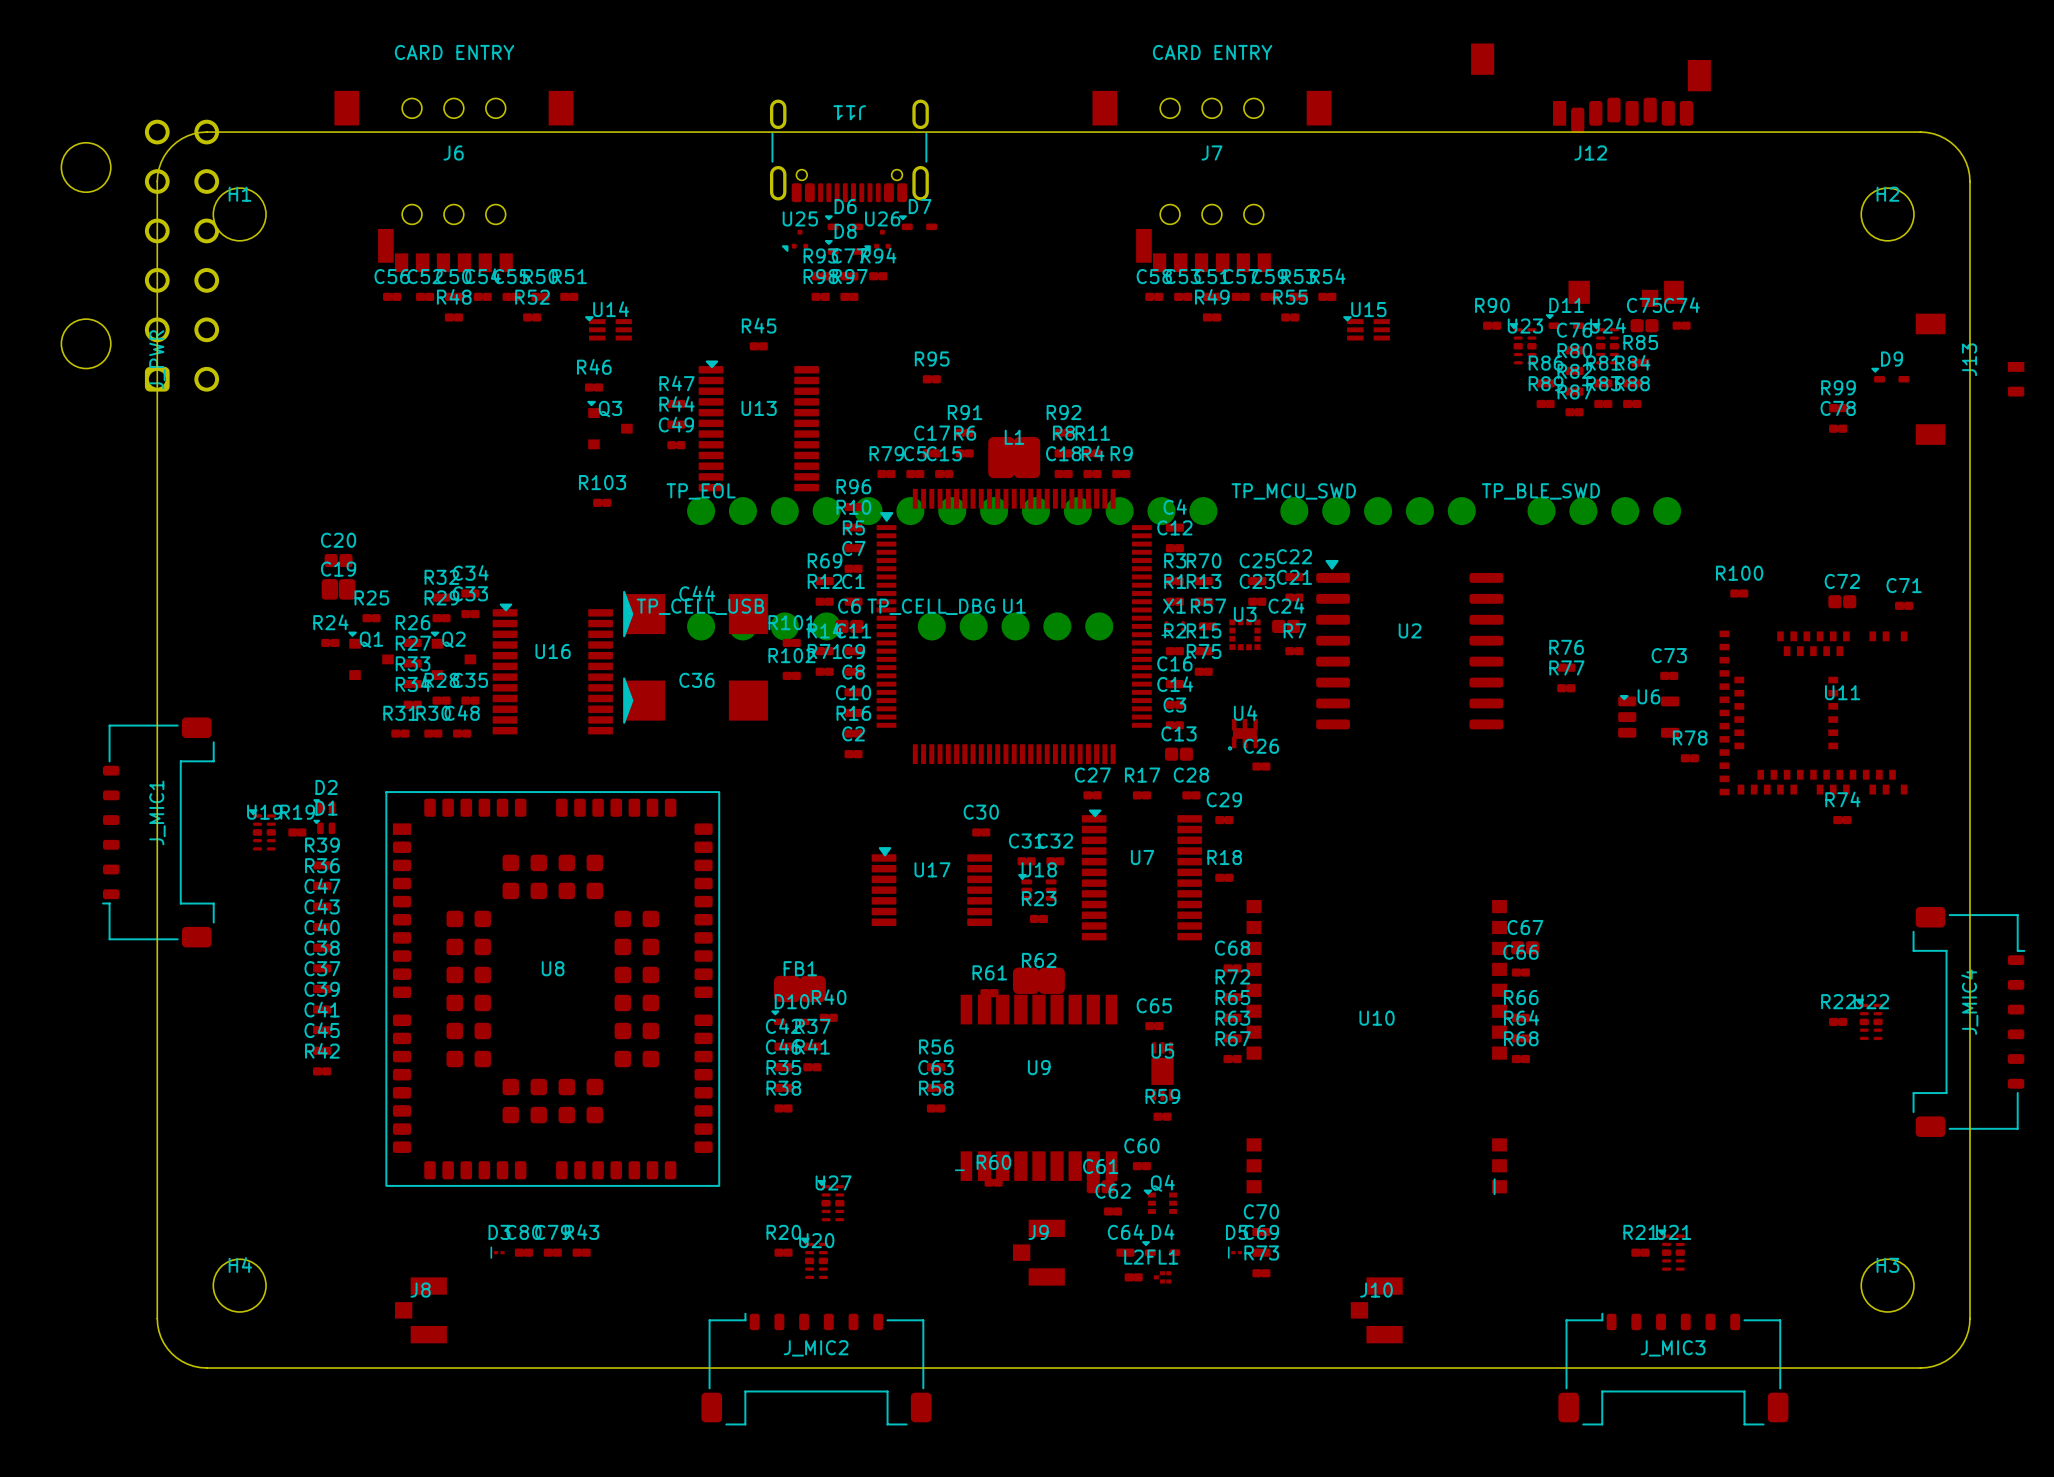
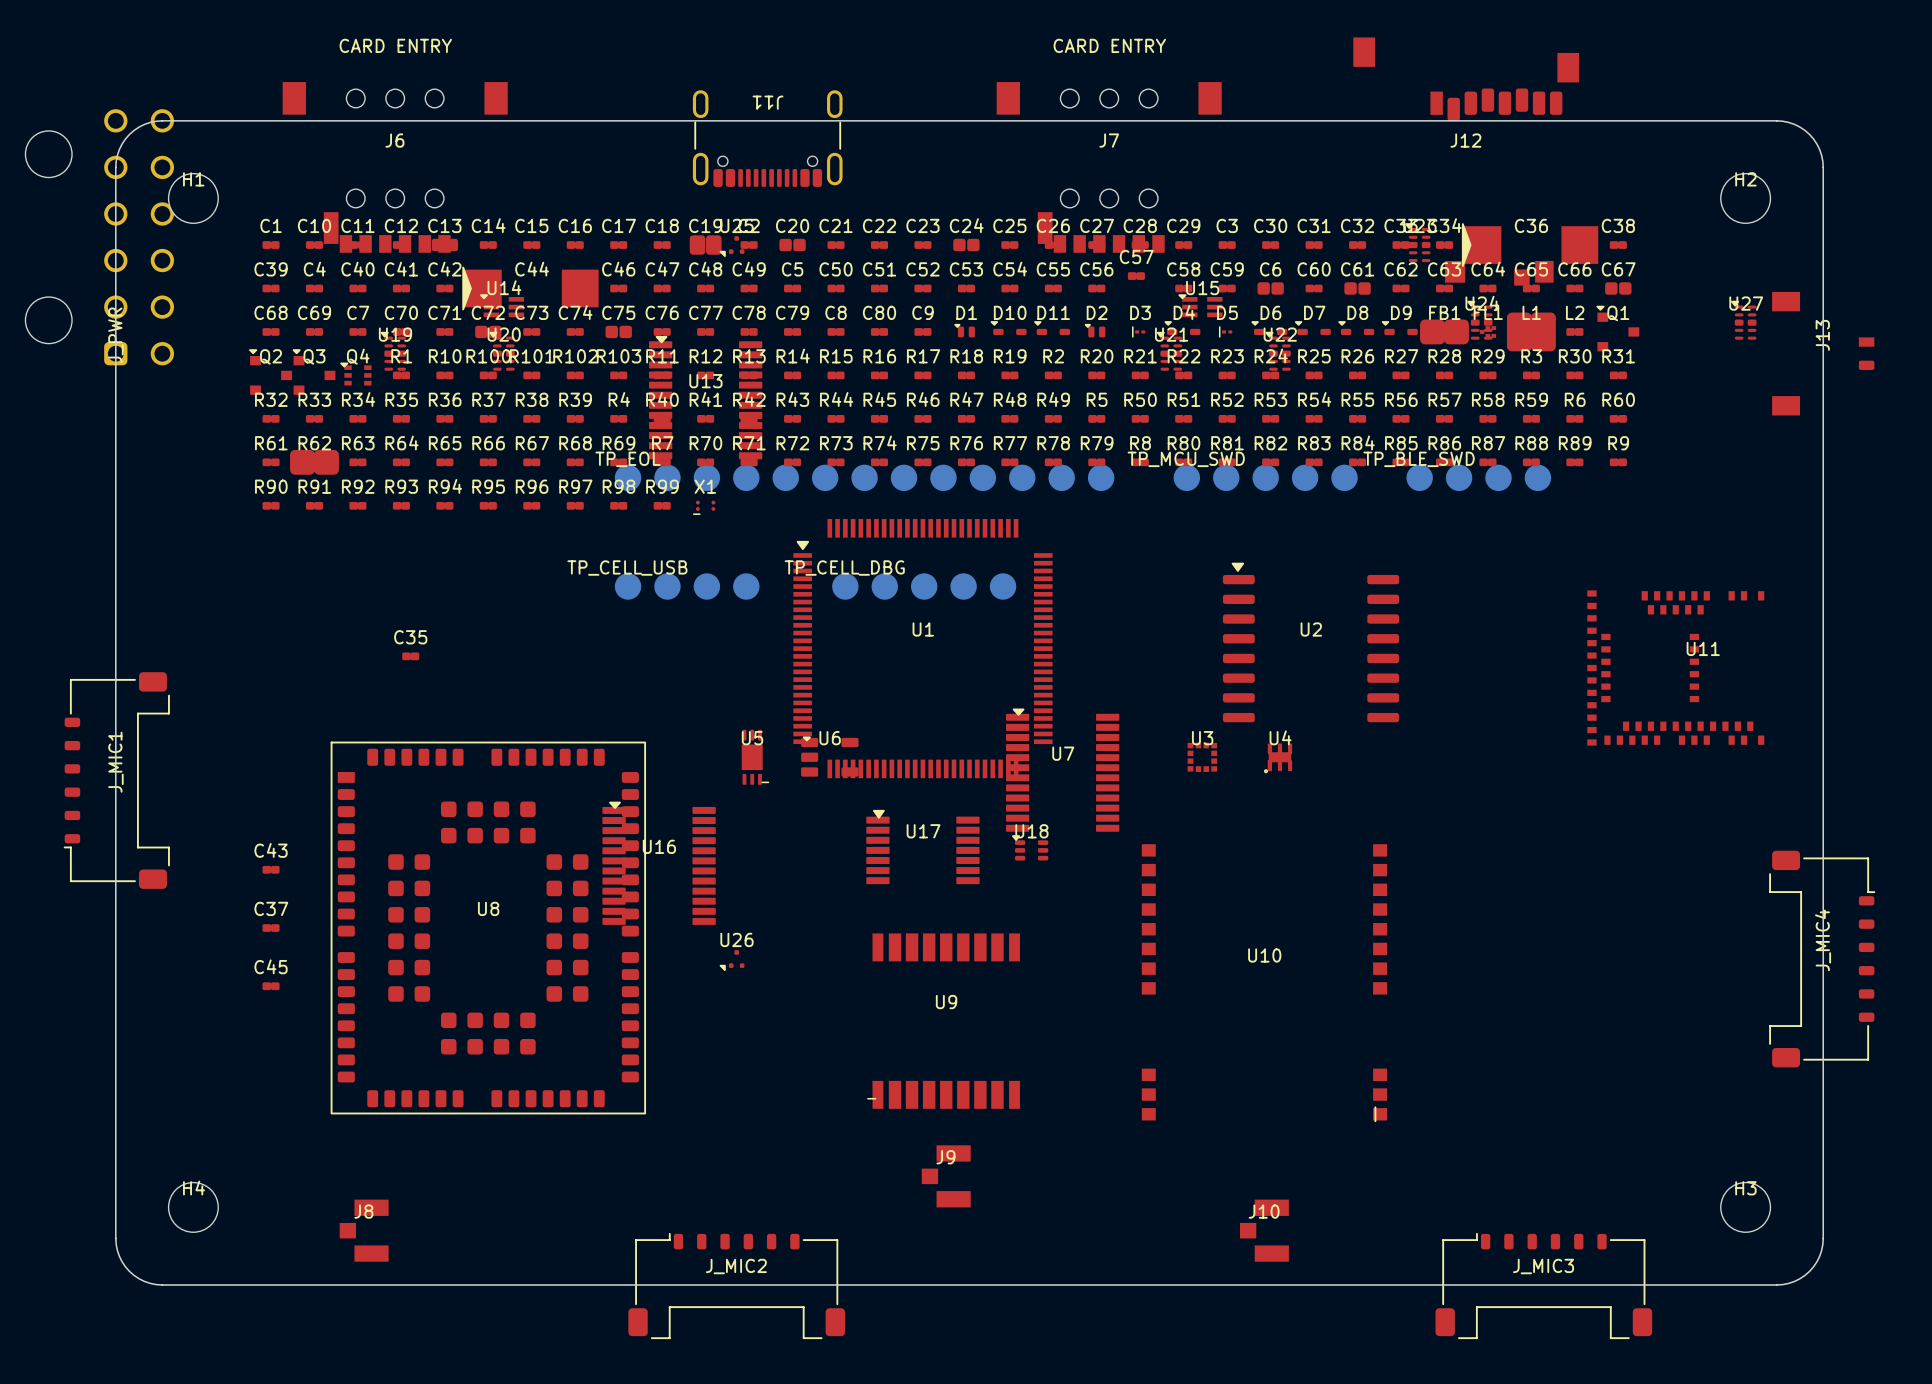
D6 position: (843, 222) -> (1269, 328)
D7 position: (918, 222) -> (1312, 328)
U25 position: (795, 240) -> (732, 246)
U26 position: (877, 240) -> (732, 960)
D8 position: (843, 247) -> (1356, 328)
R93 position: (820, 276) -> (401, 505)
C77 position: (849, 276) -> (705, 331)
R94 position: (878, 276) -> (444, 505)
C56 position: (392, 296) -> (1096, 288)
C52 position: (425, 296) -> (922, 288)
C50 position: (453, 296) -> (836, 288)
C54 position: (482, 296) -> (1009, 288)
C55 position: (511, 296) -> (1053, 288)
R50 position: (540, 296) -> (1140, 418)
R51 position: (569, 296) -> (1183, 418)
R98 position: (820, 296) -> (618, 505)
R97 position: (849, 296) -> (575, 505)
C58 position: (1154, 296) -> (1183, 288)
C53 position: (1183, 296) -> (966, 288)
C51 position: (1211, 296) -> (879, 288)
C59 position: (1269, 296) -> (1227, 288)
R53 position: (1298, 296) -> (1270, 418)
R54 position: (1327, 296) -> (1314, 418)
R48 position: (453, 317) -> (1009, 418)
R52 position: (532, 317) -> (1227, 418)
R49 position: (1211, 317) -> (1053, 418)
R55 position: (1290, 317) -> (1357, 418)
D11 position: (1564, 321) -> (1052, 328)
R90 position: (1492, 325) -> (271, 505)
C75 position: (1644, 325) -> (618, 331)
C74 position: (1681, 325) -> (575, 331)
U14 position: (608, 328) -> (501, 305)
U15 position: (1366, 328) -> (1200, 305)
U23 position: (1523, 343) -> (1417, 242)
R45 position: (758, 346) -> (879, 418)
C76 position: (1574, 350) -> (662, 331)
R85 position: (1640, 362) -> (1401, 462)
R80 position: (1574, 371) -> (1183, 462)
D9 position: (1890, 375) -> (1399, 328)
R95 position: (931, 379) -> (488, 505)
R86 position: (1545, 383) -> (1444, 462)
R81 position: (1603, 383) -> (1227, 462)
R84 position: (1632, 383) -> (1357, 462)
R46 position: (593, 387) -> (922, 418)
R82 position: (1574, 391) -> (1270, 462)
R47 position: (676, 403) -> (966, 418)
R89 position: (1545, 403) -> (1574, 462)
R83 position: (1603, 403) -> (1314, 462)
R88 position: (1632, 403) -> (1531, 462)
R99 position: (1838, 408) -> (662, 505)
R87 position: (1574, 412) -> (1487, 462)
R44 position: (676, 424) -> (836, 418)
Q3 position: (609, 425) -> (314, 372)
U13 position: (758, 425) -> (705, 397)
C78 position: (1838, 428) -> (749, 331)
R91 position: (964, 432) -> (314, 505)
R92 position: (1063, 432) -> (357, 505)
C49 position: (676, 445) -> (749, 288)
C17 position: (931, 453) -> (618, 245)
R6 position: (964, 453) -> (1574, 418)
R8 position: (1063, 453) -> (1140, 462)
R11 position: (1092, 453) -> (662, 375)
L1 position: (1014, 457) -> (1531, 331)
R79 position: (886, 474) -> (1096, 462)
C5 position: (915, 474) -> (792, 288)
C15 position: (944, 474) -> (531, 245)
C18 position: (1063, 474) -> (662, 245)
R4 position: (1092, 474) -> (618, 418)
R9 position: (1121, 474) -> (1618, 462)
R103 position: (602, 502) -> (618, 375)
R96 position: (853, 506) -> (531, 505)
R10 position: (853, 527) -> (444, 375)
C4 position: (1174, 527) -> (314, 288)
R5 position: (853, 548) -> (1096, 418)
C12 position: (1174, 548) -> (401, 245)
C20 position: (338, 560) -> (792, 245)
C7 position: (853, 568) -> (357, 331)
C22 position: (1294, 577) -> (879, 245)
R69 position: (824, 581) -> (618, 462)
R3 position: (1174, 581) -> (1531, 375)
R70 position: (1203, 581) -> (705, 462)
C25 position: (1257, 581) -> (1009, 245)
C19 position: (338, 589) -> (705, 245)
C34 position: (470, 593) -> (1444, 245)
R100 position: (1739, 593) -> (488, 375)
R32 position: (441, 597) -> (271, 418)
C21 position: (1294, 597) -> (836, 245)
R12 position: (824, 601) -> (705, 375)
C1 position: (853, 601) -> (271, 245)
R1 position: (1174, 601) -> (401, 375)
R13 position: (1203, 601) -> (749, 375)
C23 position: (1257, 601) -> (922, 245)
C72 position: (1842, 601) -> (488, 331)
C71 position: (1904, 605) -> (444, 331)
C33 position: (470, 614) -> (1401, 245)
C44 position: (695, 614) -> (530, 288)
R25 position: (371, 618) -> (1314, 375)
R29 position: (441, 618) -> (1487, 375)
C6 position: (849, 626) -> (1270, 288)
U1 position: (1014, 626) -> (922, 648)
R57 position: (1207, 626) -> (1444, 418)
C24 position: (1286, 626) -> (966, 245)
X1 position: (1173, 628) -> (704, 507)
U3 position: (1244, 634) -> (1202, 757)
R24 position: (330, 642) -> (1270, 375)
R26 position: (412, 642) -> (1357, 375)
R101 position: (791, 642) -> (531, 375)
U2 position: (1409, 644) -> (1311, 642)
R14 position: (824, 651) -> (792, 375)
C11 position: (853, 651) -> (357, 245)
R2 position: (1174, 651) -> (1053, 375)
R15 position: (1203, 651) -> (836, 375)
R7 position: (1294, 651) -> (662, 462)
Q1 position: (371, 655) -> (1617, 328)
Q2 position: (453, 655) -> (270, 372)
R27 position: (412, 663) -> (1401, 375)
R76 position: (1566, 667) -> (966, 462)
U16 position: (552, 668) -> (659, 863)
R71 position: (824, 671) -> (749, 462)
C9 position: (853, 671) -> (922, 331)
R75 position: (1203, 671) -> (922, 462)
R102 position: (791, 675) -> (575, 375)
C73 position: (1669, 675) -> (531, 331)
R33 position: (412, 684) -> (314, 418)
C16 position: (1174, 684) -> (575, 245)
R77 position: (1566, 688) -> (1009, 462)
C8 position: (853, 692) -> (836, 331)
R28 position: (441, 700) -> (1444, 375)
C36 position: (695, 700) -> (1530, 245)
R34 position: (412, 704) -> (357, 418)
C14 position: (1174, 704) -> (488, 245)
C10 position: (853, 712) -> (314, 245)
U6 position: (1648, 716) -> (829, 756)
C3 position: (1174, 725) -> (1227, 245)
R31 position: (400, 733) -> (1618, 375)
R30 position: (433, 733) -> (1574, 375)
C48 position: (462, 733) -> (705, 288)
R16 position: (853, 733) -> (879, 375)
U4 position: (1242, 734) -> (1278, 758)
C2 position: (853, 754) -> (749, 245)
C13 position: (1178, 754) -> (444, 245)
R78 position: (1689, 758) -> (1053, 462)
C26 position: (1261, 766) -> (1053, 245)
C27 position: (1092, 795) -> (1096, 245)
R17 position: (1141, 795) -> (922, 375)
C28 position: (1191, 795) -> (1140, 245)
D2 position: (324, 806) -> (1095, 330)
C29 position: (1224, 820) -> (1183, 245)
R74 position: (1842, 820) -> (879, 462)
D1 position: (324, 826) -> (964, 330)
U19 position: (262, 829) -> (393, 351)
R19 position: (297, 832) -> (1009, 375)
C30 position: (981, 832) -> (1270, 245)
C31 position: (1026, 861) -> (1314, 245)
C32 position: (1055, 861) -> (1357, 245)
R39 position: (322, 865) -> (575, 418)
U7 position: (1141, 874) -> (1062, 770)
R18 position: (1224, 877) -> (966, 375)
R36 position: (322, 885) -> (444, 418)
U17 position: (931, 886) -> (922, 847)
U18 position: (1037, 887) -> (1030, 847)
C47 position: (322, 906) -> (662, 288)
R23 position: (1038, 918) -> (1227, 375)
C40 position: (322, 947) -> (357, 288)
C67 position: (1525, 947) -> (1618, 288)
C38 position: (322, 968) -> (1618, 245)
C68 position: (1232, 968) -> (271, 331)
C66 position: (1520, 972) -> (1574, 288)
R62 position: (1038, 980) -> (314, 462)
FB1 position: (799, 988) -> (1444, 331)
R61 position: (989, 993) -> (271, 462)
R72 position: (1232, 997) -> (792, 462)
C39 position: (322, 1009) -> (271, 288)
D10 position: (790, 1017) -> (1008, 328)
R40 position: (828, 1017) -> (662, 418)
R65 position: (1232, 1017) -> (444, 462)
R66 position: (1520, 1017) -> (488, 462)
U22 position: (1869, 1019) -> (1278, 351)
R22 position: (1838, 1021) -> (1183, 375)
C65 position: (1154, 1026) -> (1531, 288)
C41 position: (322, 1030) -> (401, 288)
R63 position: (1232, 1038) -> (357, 462)
R64 position: (1520, 1038) -> (401, 462)
C42 position: (783, 1046) -> (444, 288)
R37 position: (812, 1046) -> (488, 418)
R67 position: (1232, 1059) -> (531, 462)
R68 position: (1520, 1059) -> (575, 462)
C46 position: (783, 1067) -> (618, 288)
R41 position: (812, 1067) -> (705, 418)
R56 position: (935, 1067) -> (1401, 418)
R42 position: (322, 1071) -> (749, 418)
U5 position: (1166, 1071) -> (755, 757)
R35 position: (783, 1087) -> (401, 418)
C63 position: (935, 1087) -> (1444, 288)
R38 position: (783, 1108) -> (531, 418)
R58 position: (935, 1108) -> (1487, 418)
R59 position: (1162, 1116) -> (1531, 418)
C60 position: (1141, 1166) -> (1314, 288)
R60 position: (993, 1182) -> (1618, 418)
C61 position: (1100, 1186) -> (1357, 288)
U27 position: (830, 1200) -> (1743, 320)
Q4 position: (1160, 1201) -> (355, 374)
C62 position: (1113, 1211) -> (1401, 288)
C70 position: (1261, 1232) -> (401, 331)
D4 position: (1161, 1248) -> (1182, 328)
U21 position: (1671, 1250) -> (1169, 351)
D3 position: (497, 1252) -> (1138, 331)
C80 position: (523, 1252) -> (879, 331)
C79 position: (552, 1252) -> (792, 331)
R43 position: (581, 1252) -> (792, 418)
R20 position: (783, 1252) -> (1096, 375)
C64 position: (1125, 1252) -> (1487, 288)
D5 position: (1235, 1252) -> (1225, 331)
C69 position: (1261, 1252) -> (314, 331)
R21 position: (1640, 1252) -> (1140, 375)
U20 position: (814, 1258) -> (501, 351)
R73 position: (1261, 1273) -> (836, 462)
L2 position: (1133, 1277) -> (1574, 331)
FL1 position: (1162, 1277) -> (1487, 331)

